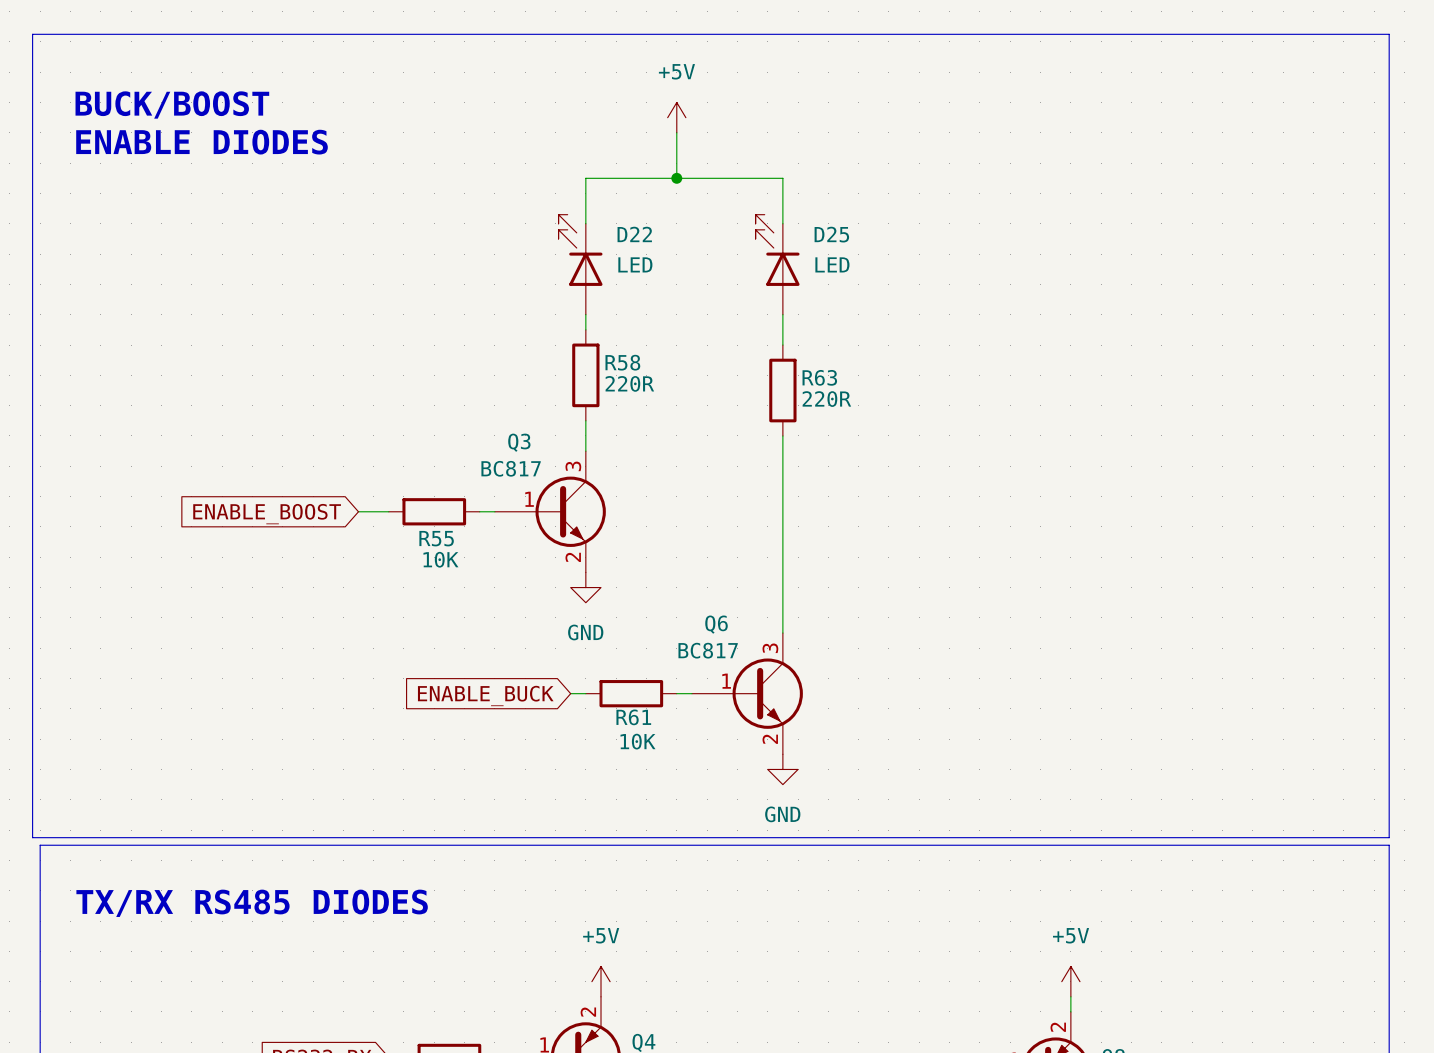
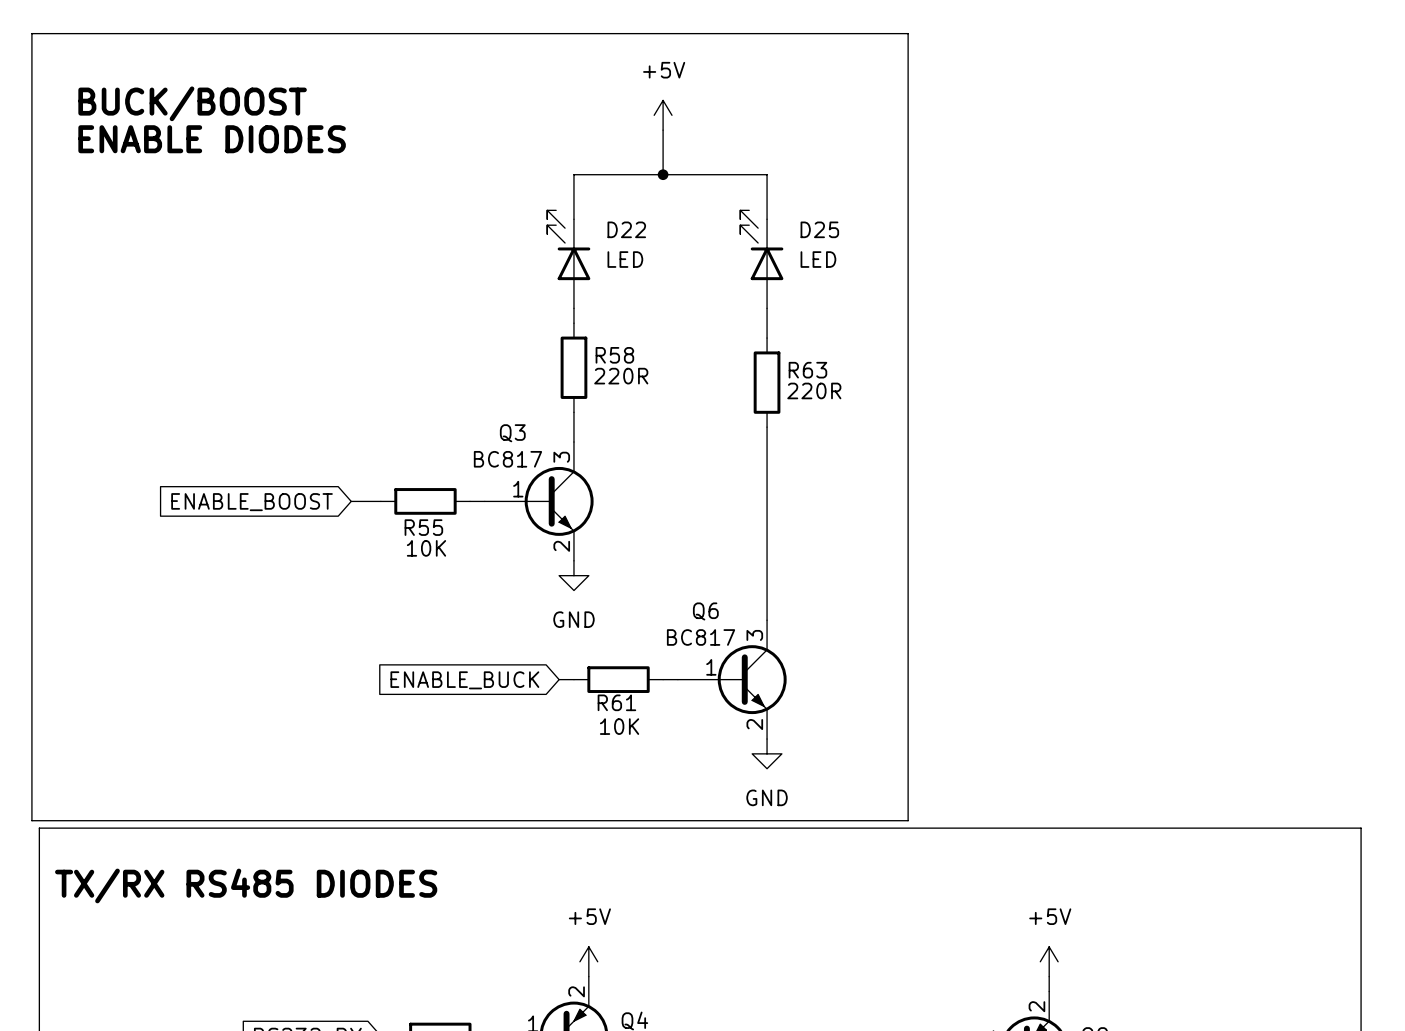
line: (926, 34) (1389, 34) (1389, 837) (926, 837) -> (908, 33) (908, 820)

